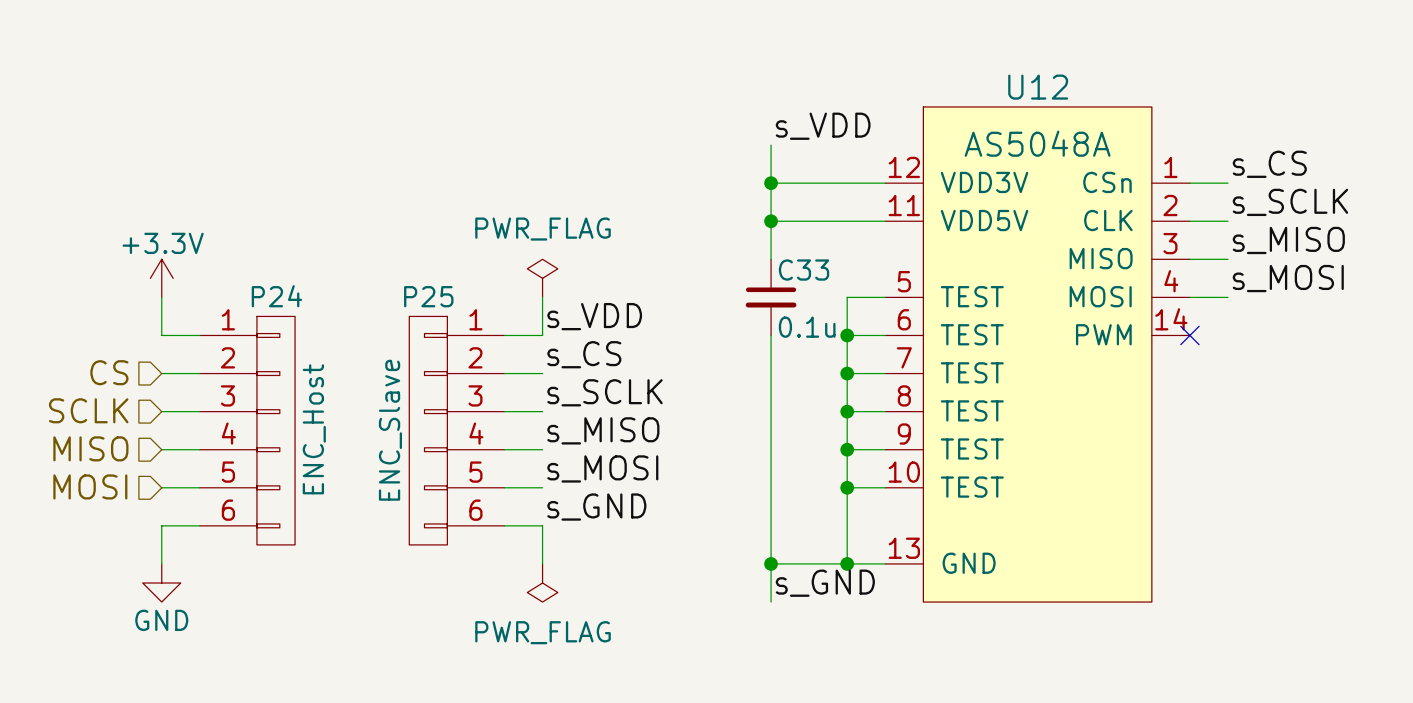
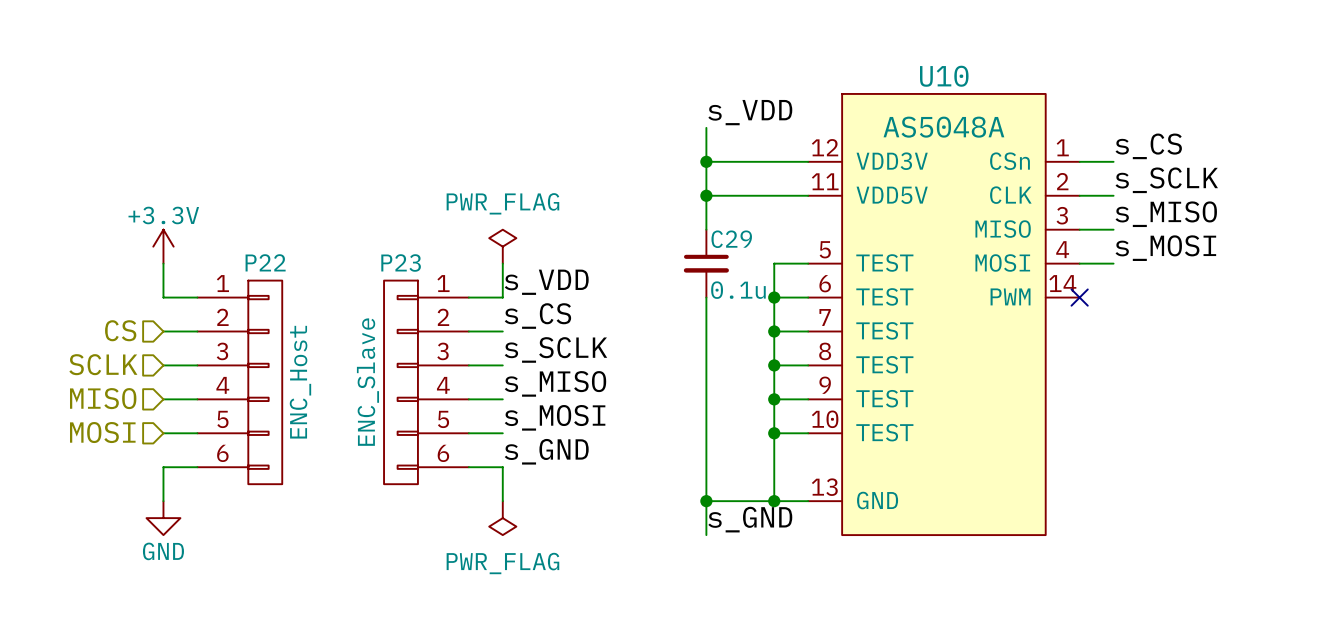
U12 name: U12 (1038, 87) -> U10 (944, 76)
C33 name: C33 (804, 270) -> C29 (731, 239)
P24 name: P24 (276, 296) -> P22 (265, 262)
P25 name: P25 (428, 296) -> P23 (401, 262)

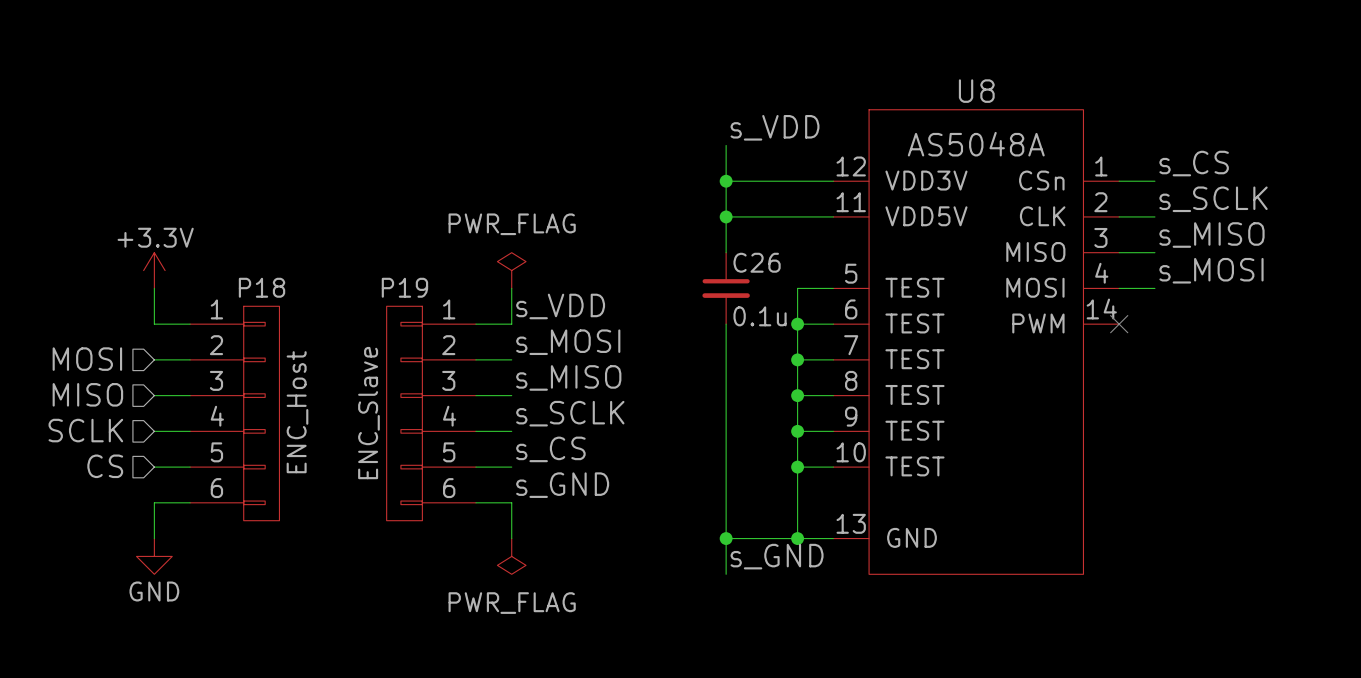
U10 name: U10 (944, 76) -> U8 (976, 91)
C29 name: C29 (731, 239) -> C26 (757, 262)
P22 name: P22 (265, 262) -> P18 (262, 287)
P23 name: P23 (401, 262) -> P19 (404, 287)
label: s_CS (537, 316) -> s_MOSI (568, 342)
hierarchical label: CS (120, 330) -> MOSI (87, 359)
label: s_SCLK (555, 349) -> s_MISO (568, 377)
hierarchical label: SCLK (103, 364) -> MISO (87, 394)
label: s_MISO (555, 383) -> s_SCLK (570, 413)
hierarchical label: MISO (103, 398) -> SCLK (85, 430)
label: s_MOSI (555, 417) -> s_CS (550, 449)
hierarchical label: MOSI (102, 432) -> CS (105, 466)

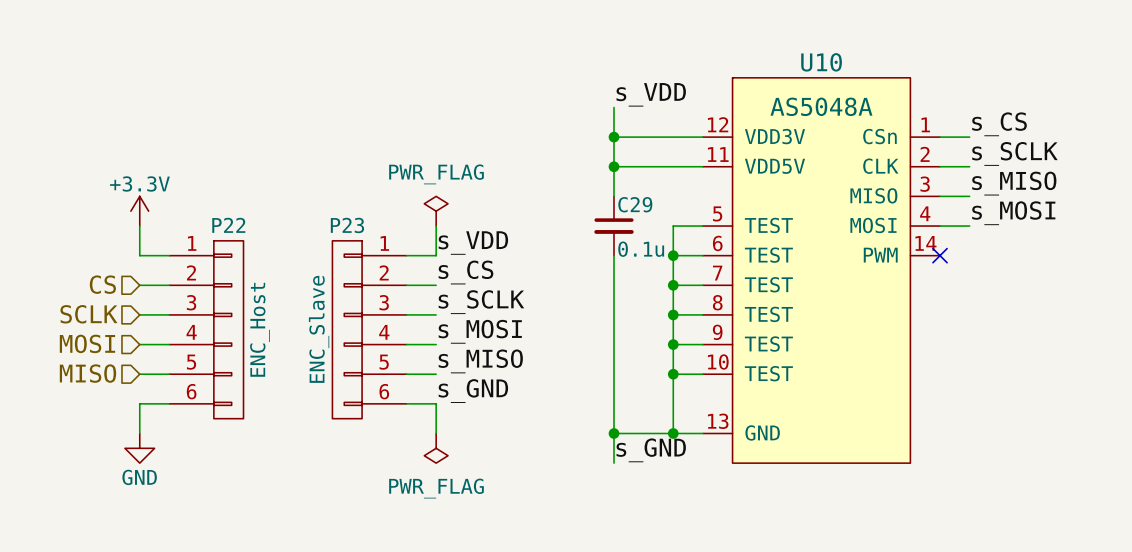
U8 name: U8 (976, 91) -> U10 (821, 62)
C26 name: C26 (757, 262) -> C29 (635, 204)
P18 name: P18 (262, 287) -> P22 (228, 225)
P19 name: P19 (404, 287) -> P23 (347, 225)
label: s_MOSI (568, 342) -> s_CS (465, 272)
hierarchical label: MOSI (87, 359) -> CS (102, 284)
label: s_MISO (568, 377) -> s_SCLK (481, 302)
hierarchical label: MISO (87, 394) -> SCLK (88, 314)
label: s_SCLK (570, 413) -> s_MOSI (480, 331)
hierarchical label: SCLK (85, 430) -> MOSI (87, 343)
label: s_CS (550, 449) -> s_MISO (480, 361)
hierarchical label: CS (105, 466) -> MISO (87, 373)

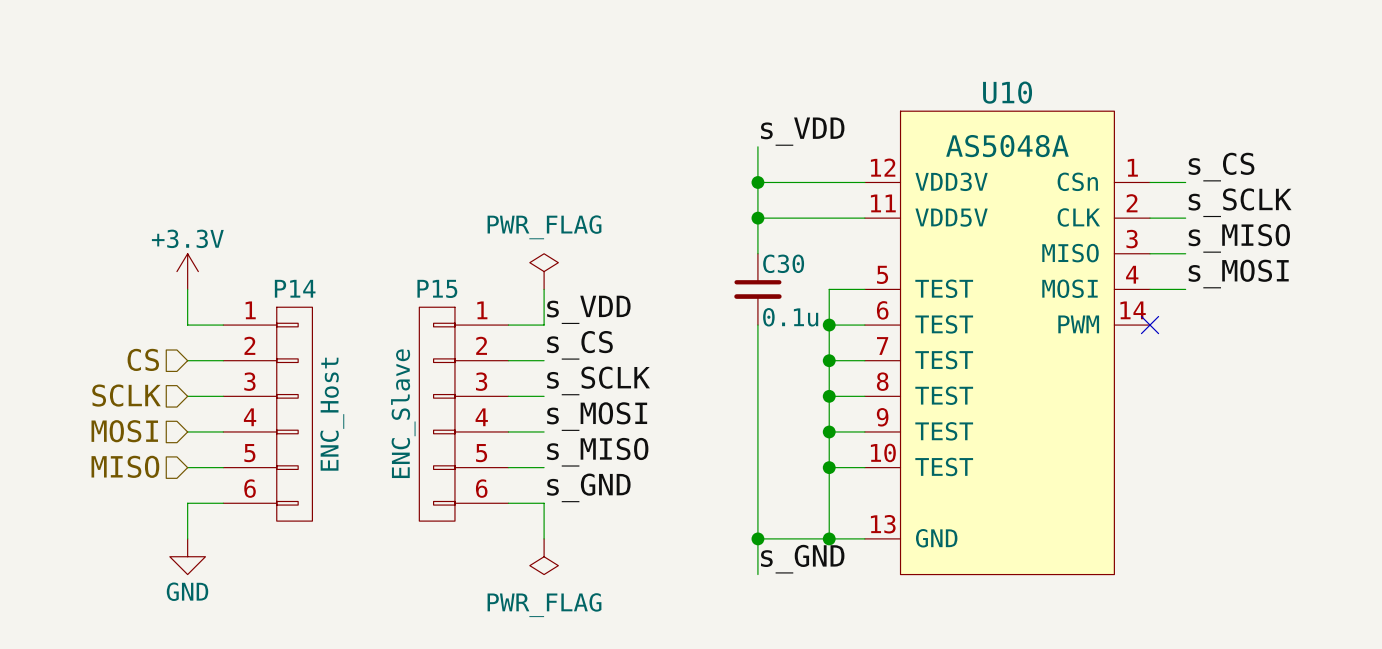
C29 name: C29 (635, 204) -> C30 (783, 263)
P22 name: P22 (228, 225) -> P14 (295, 288)
P23 name: P23 (347, 225) -> P15 (437, 288)

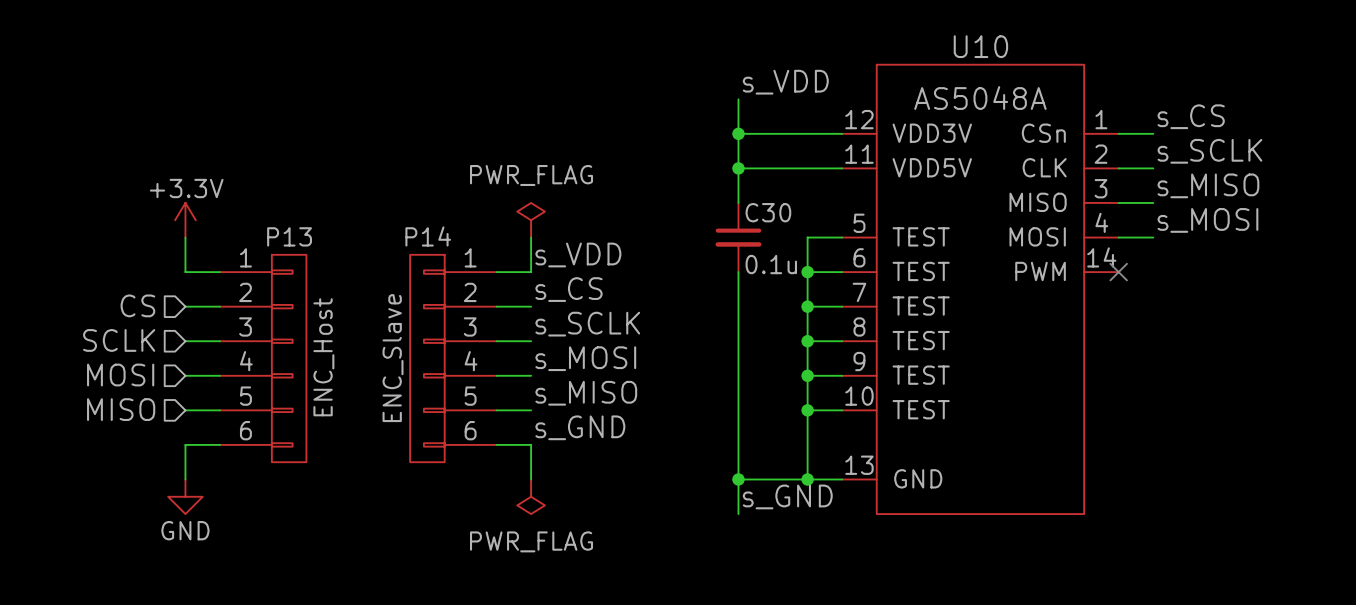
P14 name: P14 (295, 288) -> P13 (289, 236)
P15 name: P15 (437, 288) -> P14 (428, 236)

